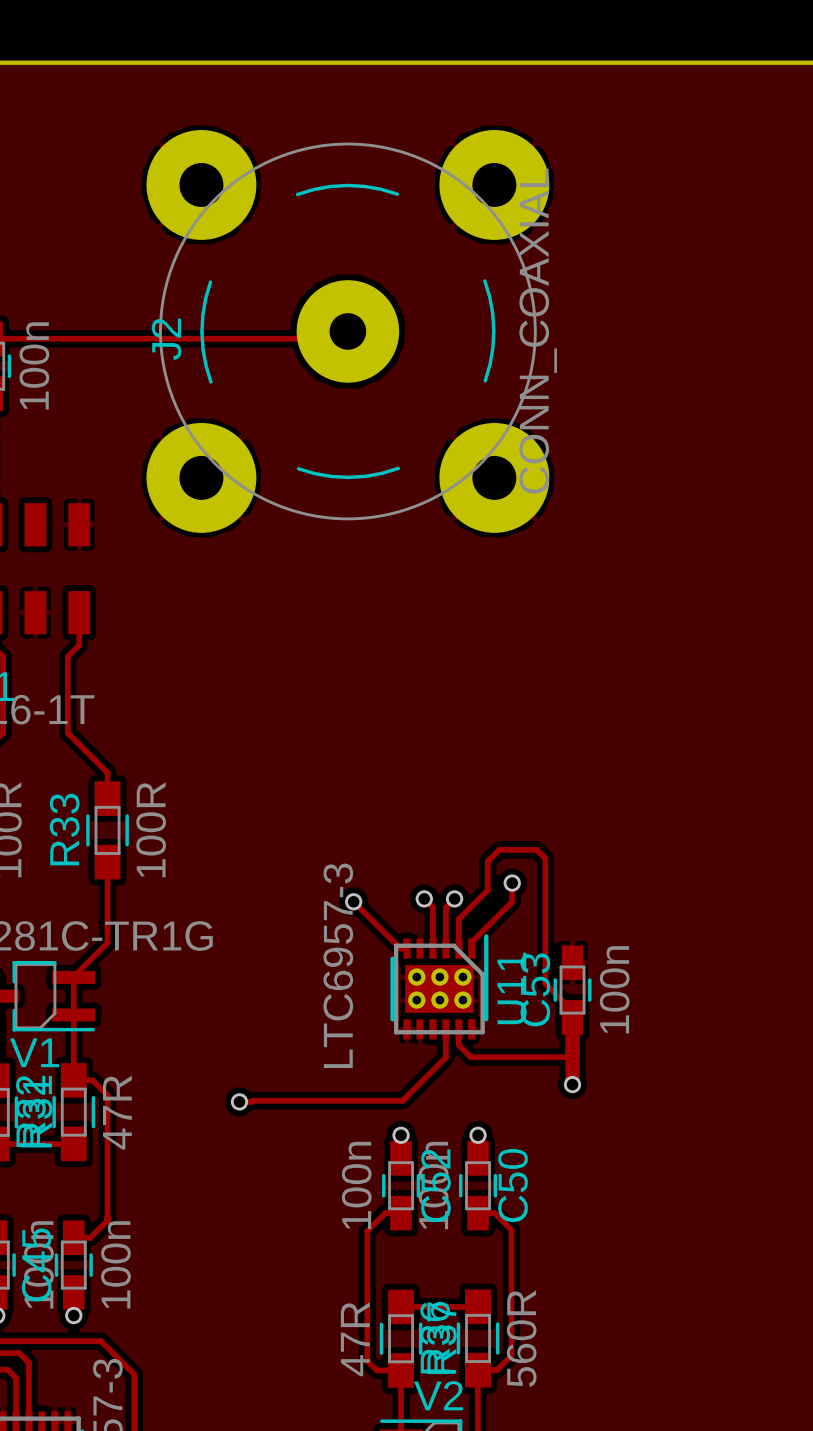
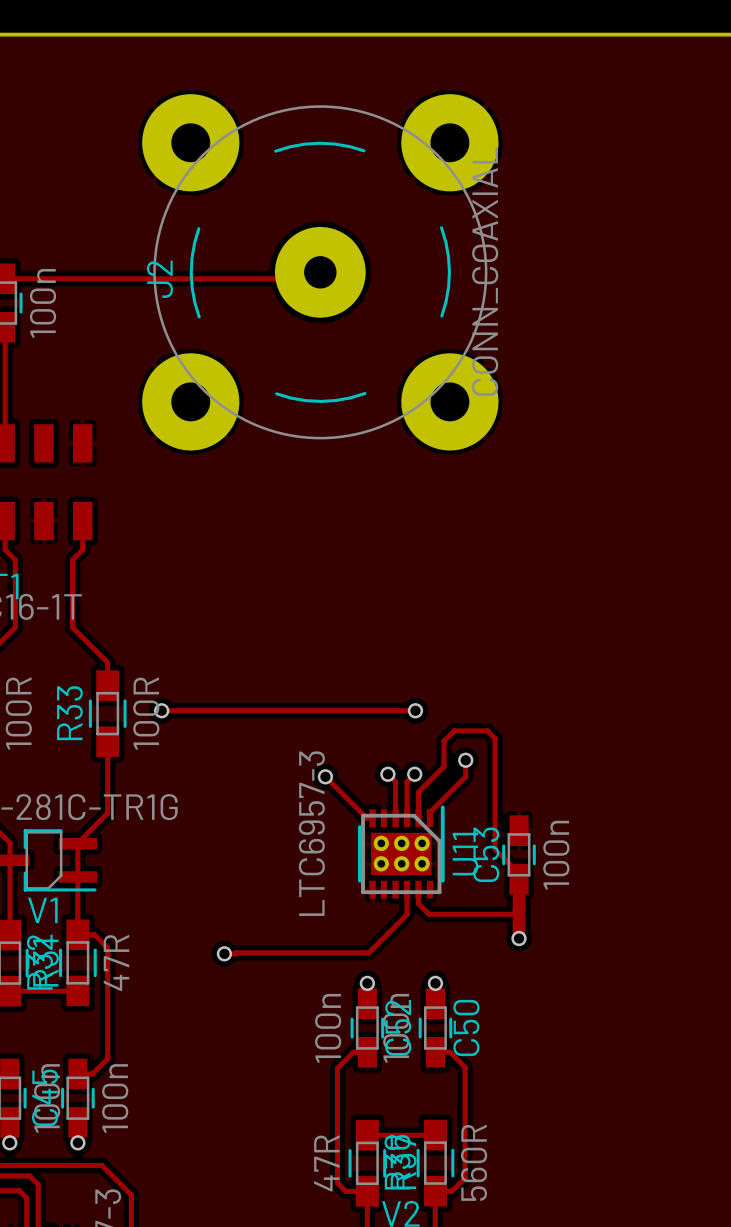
track: none -> (161, 710) (415, 710)
via: none -> (161, 710)
via: none -> (415, 710)

